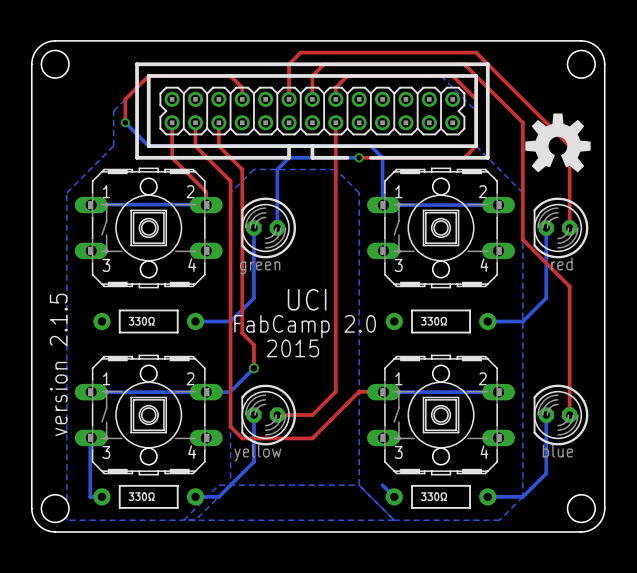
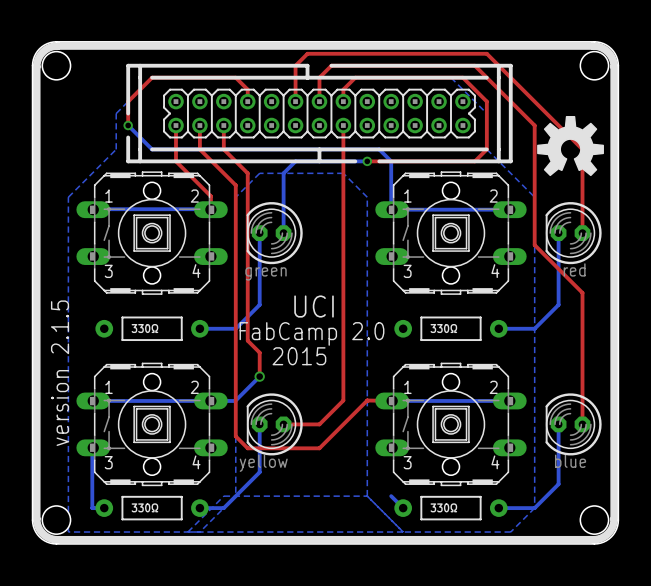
line: none -> (57, 46) (593, 46) (601, 47) (608, 52) (612, 58) (614, 66) (614, 518) (612, 526) (608, 533) (601, 538) (593, 539) (57, 539) (49, 538) (42, 533) (38, 526) (36, 518) (36, 66) (38, 58) (42, 52) (49, 47) (57, 46)
line: none -> (140, 65) (128, 65) (128, 113)
line: (300, 64) (324, 64) -> (307, 65) (307, 77)
line: none -> (498, 65) (510, 65) (510, 161) (498, 161)
line: (148, 75) (148, 146) -> none
line: (476, 75) (476, 146) -> none
line: none -> (128, 137) (128, 161) (140, 161)
line: (289, 146) (289, 157) -> (319, 161) (295, 161)

